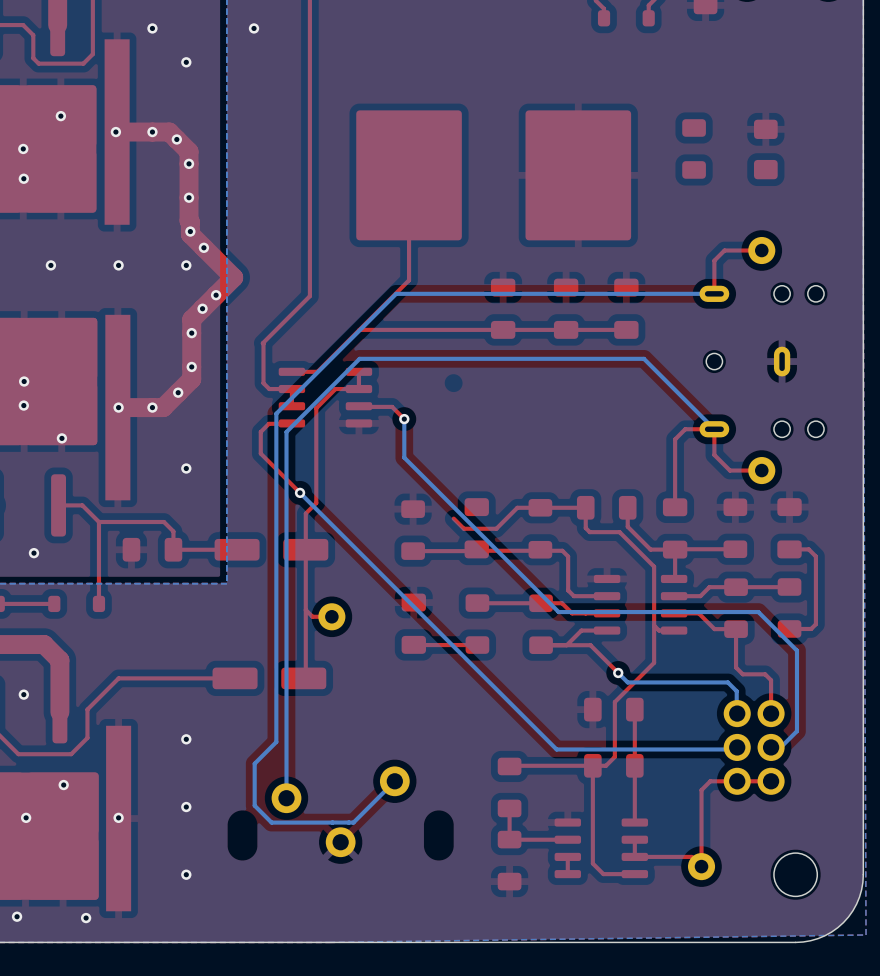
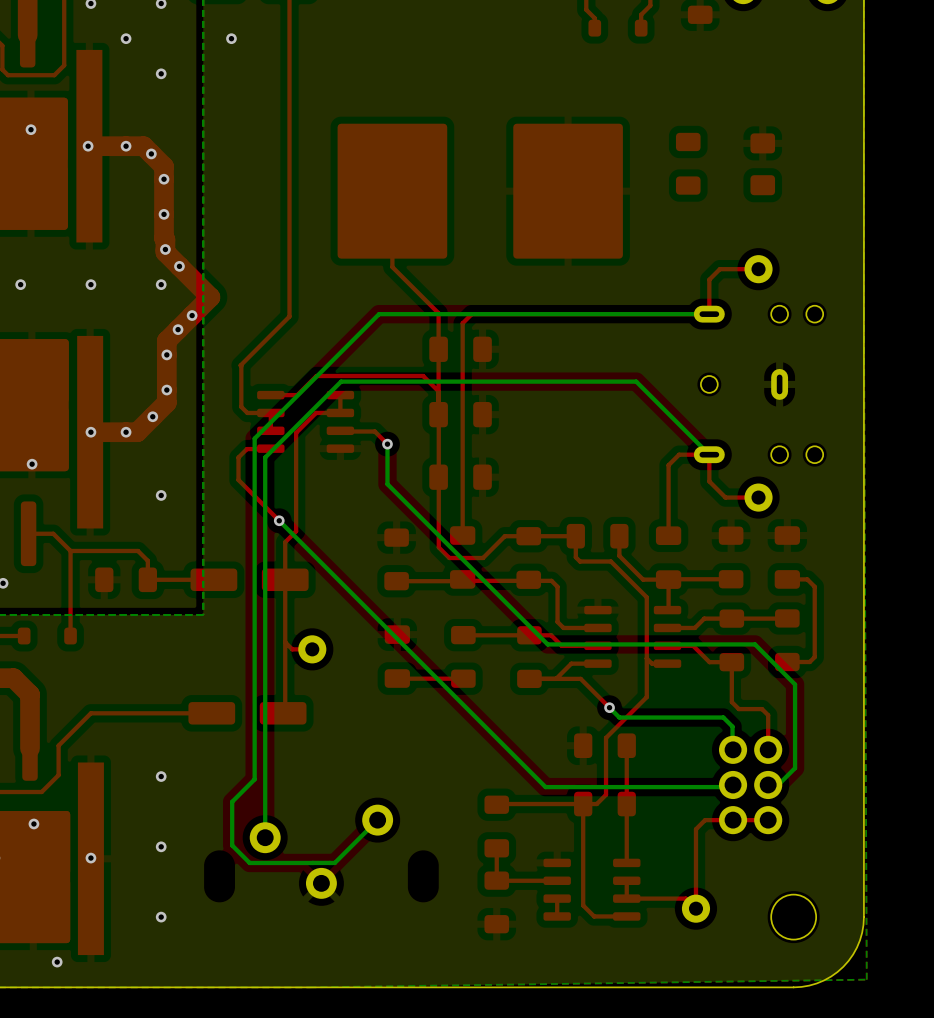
top track: (409, 248) (409, 280) (335, 353) -> (392, 267) (438, 313) (438, 414)
top track: none -> (709, 314) (471, 314) (462, 323) (462, 535)
part rotation: 0° (503, 308) -> 90° clockwise (460, 349)
part: (566, 308) -> none
part: (626, 308) -> none
top track: (626, 329) (359, 329) -> none
top track: none -> (316, 375) (423, 375) (438, 391)
top track: none -> (438, 406) (438, 547)
part: none -> (460, 414)
part: none -> (460, 477)

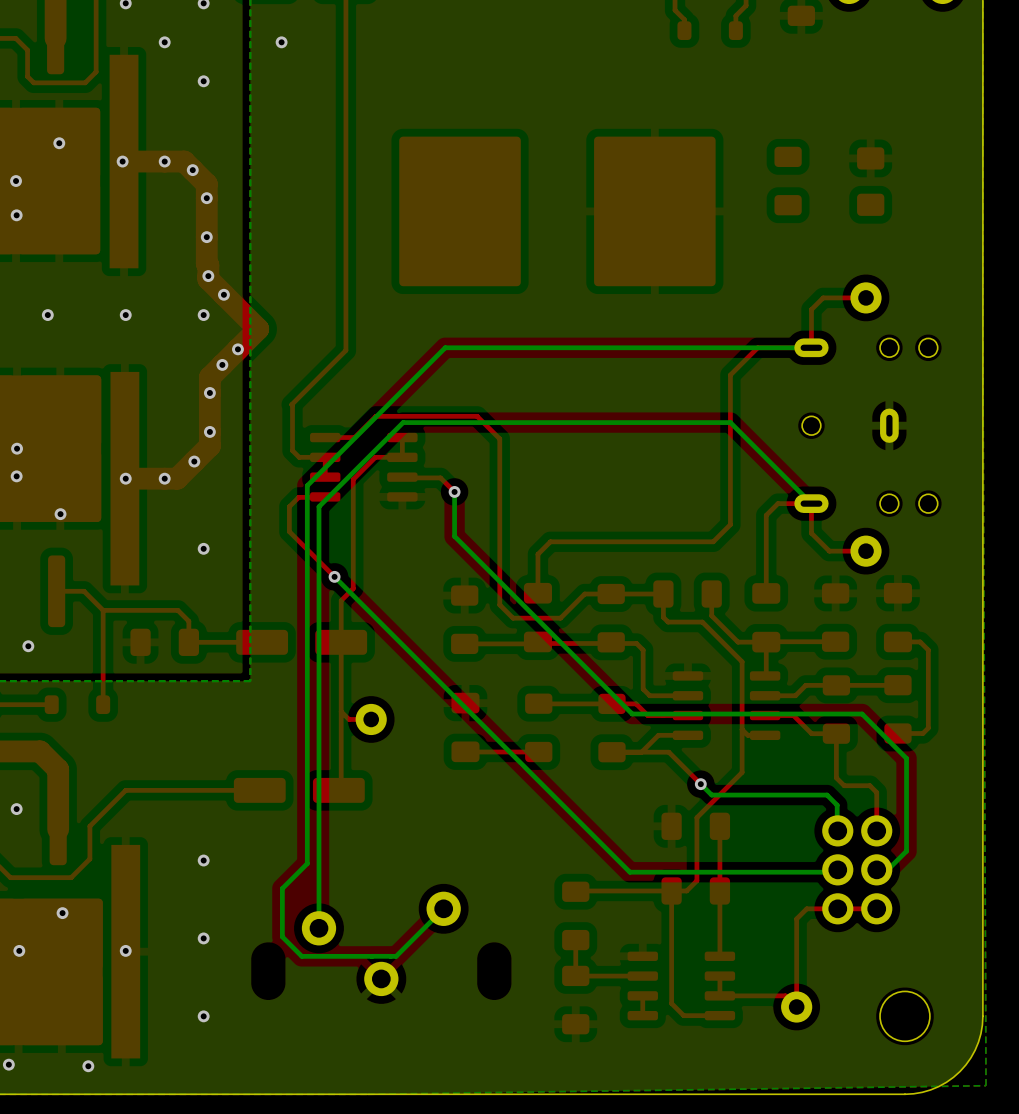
top track: (392, 191) (392, 267) (438, 313) (438, 414) -> none
top track: (660, 314) (471, 314) (462, 323) (462, 500) -> (757, 347) (730, 375) (730, 524) (713, 541) (550, 541) (537, 554)
part: (460, 349) -> none
top track: (407, 375) (423, 375) (438, 391) -> none
top track: (438, 406) (438, 547) (449, 558) -> (477, 416) (499, 438) (499, 604) (513, 618) (523, 618)
part: (460, 414) -> none
part: (460, 477) -> none

